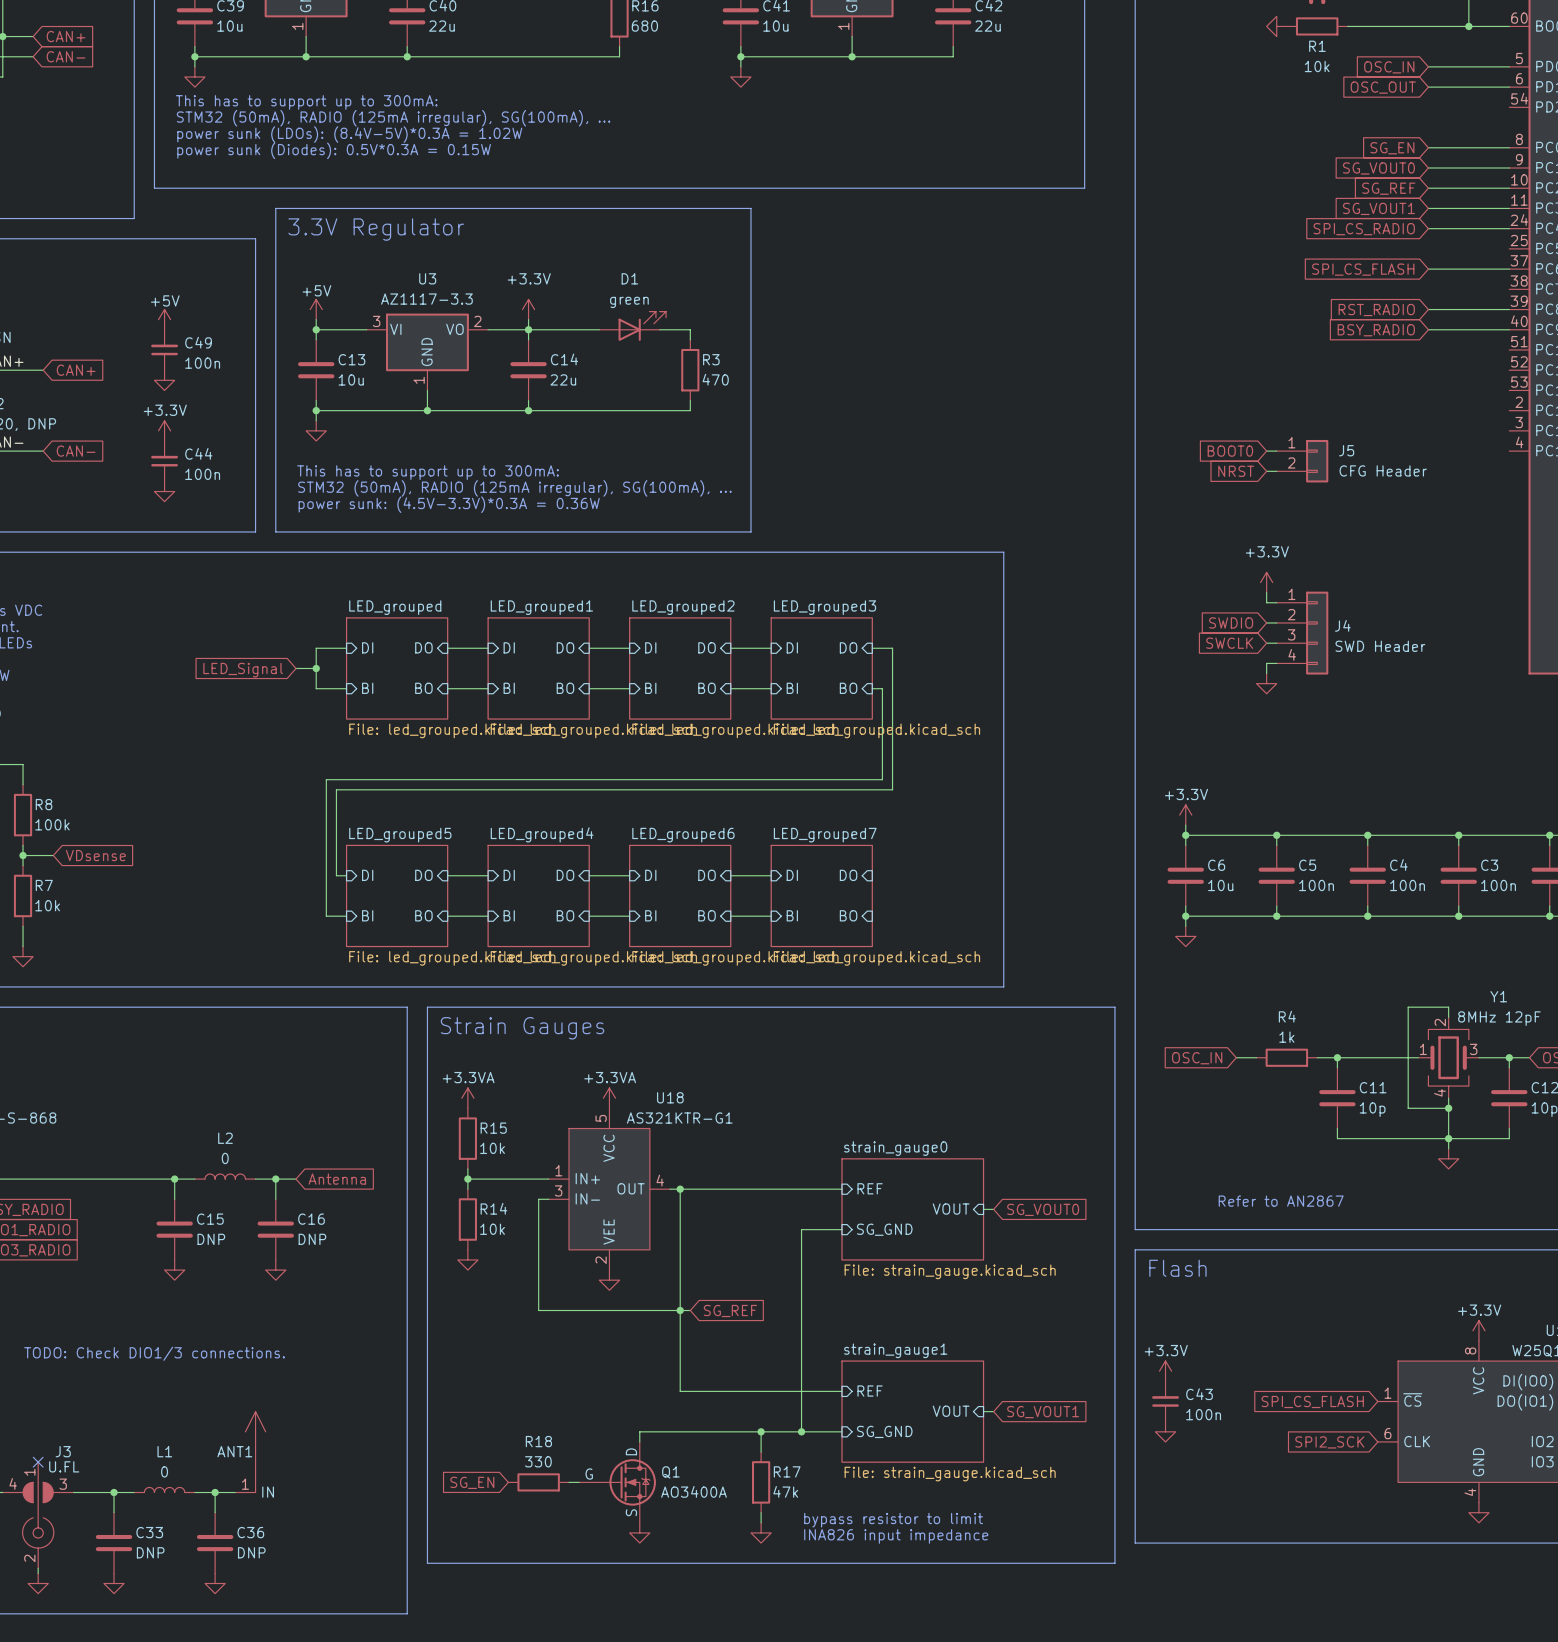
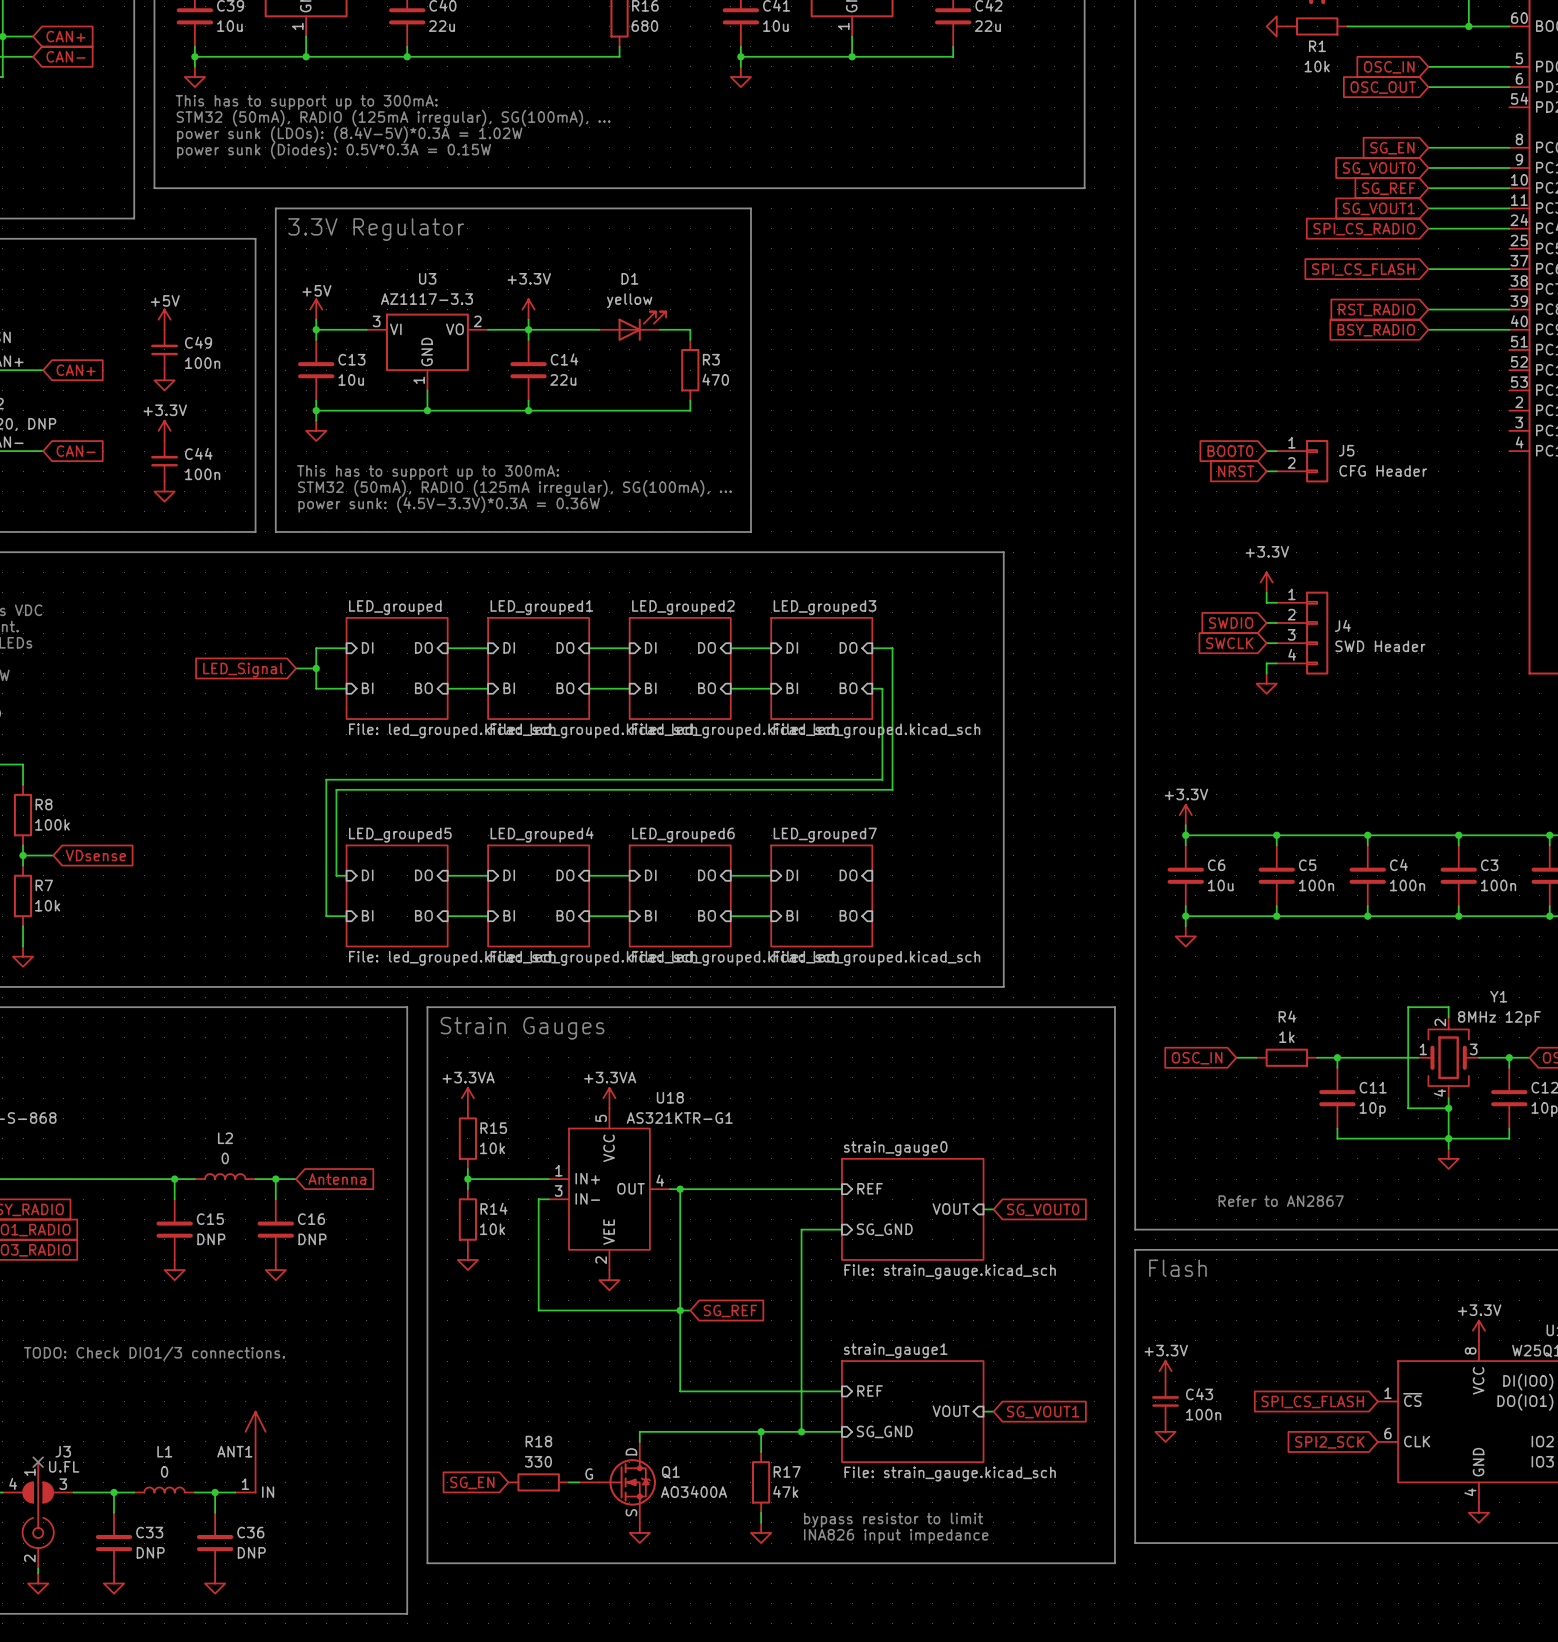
D1 value: green (629, 302) -> yellow (629, 300)

